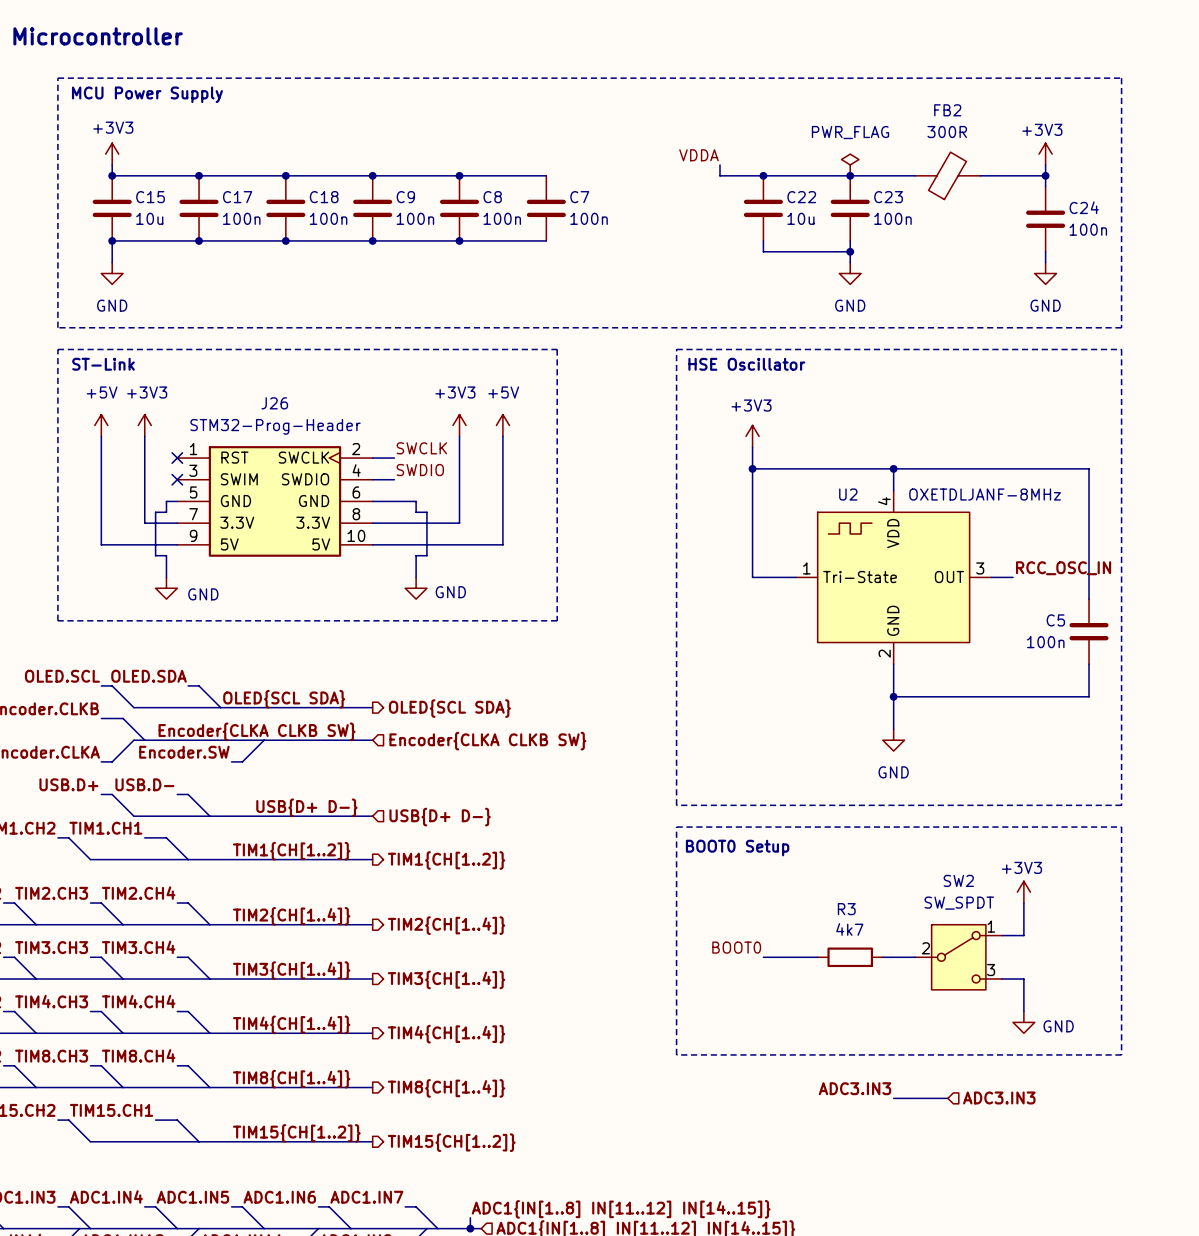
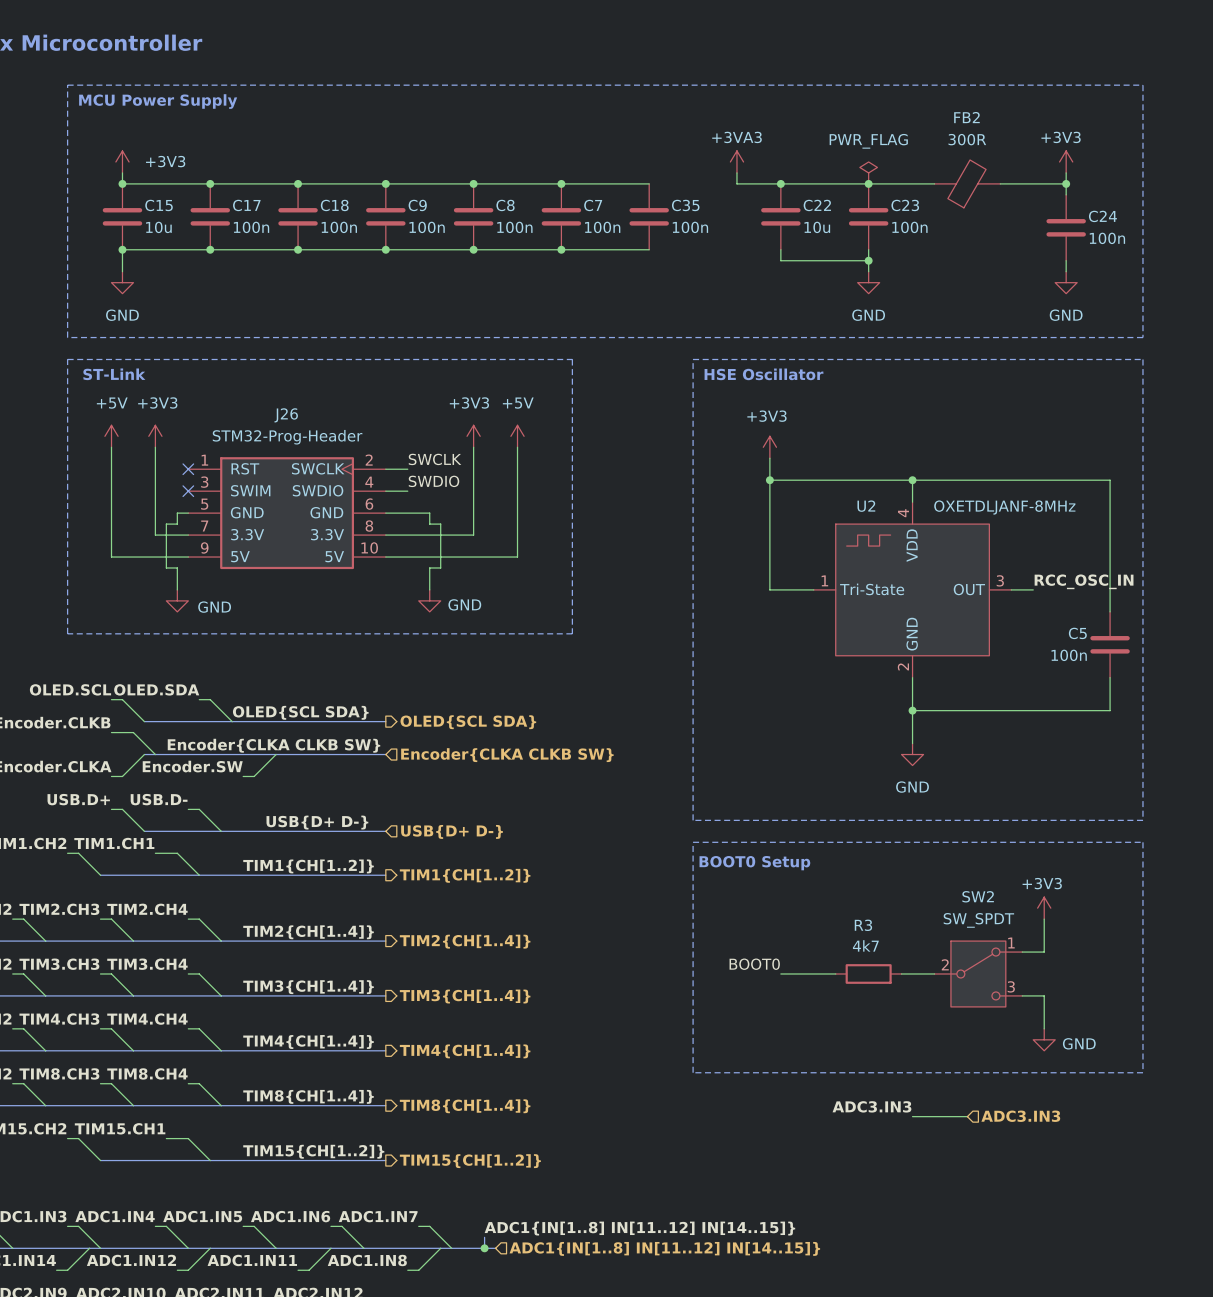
power symbol text position: +3V3 (113, 127) -> +3V3 (165, 161)
power symbol: none -> +3VA3 (736, 161)
label: VDDA (698, 155) -> none
wire: none -> (561, 183) (649, 183)
junction: none -> (561, 183)
C35: none -> 100n (649, 216)
wire: none -> (561, 249) (649, 249)
junction: none -> (561, 249)

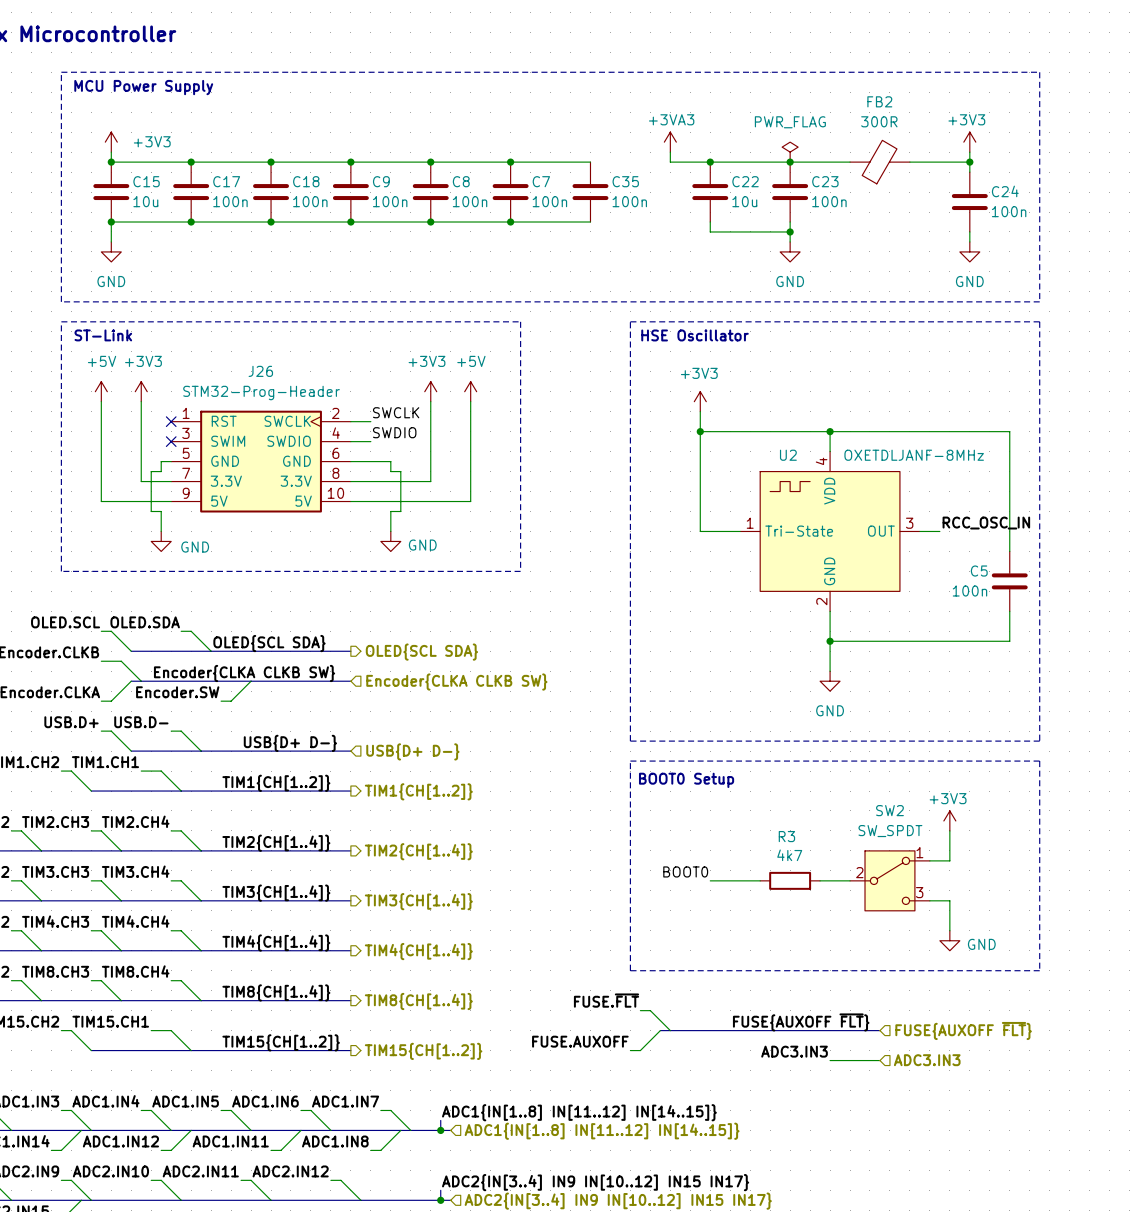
label: none -> FUSE.~{FLT} (606, 1000)
label position: ADC3.IN3 (871, 1106) -> ADC3.IN3 (794, 1051)
wire: none -> (640, 1010) (650, 1010) (670, 1030)
wire: (912, 1116) (967, 1116) -> (830, 1060) (879, 1060)
hierarchical label position: ADC3.IN3 (1020, 1116) -> ADC3.IN3 (927, 1060)
label: none -> FUSE{AUXOFF ~{FLT}} (801, 1022)
wire: none -> (660, 1030) (640, 1050) (630, 1050)
bus: none -> (660, 1030) (879, 1030)
hierarchical label: none -> FUSE{AUXOFF ~{FLT}} (963, 1030)
label: none -> FUSE.AUXOFF (580, 1041)

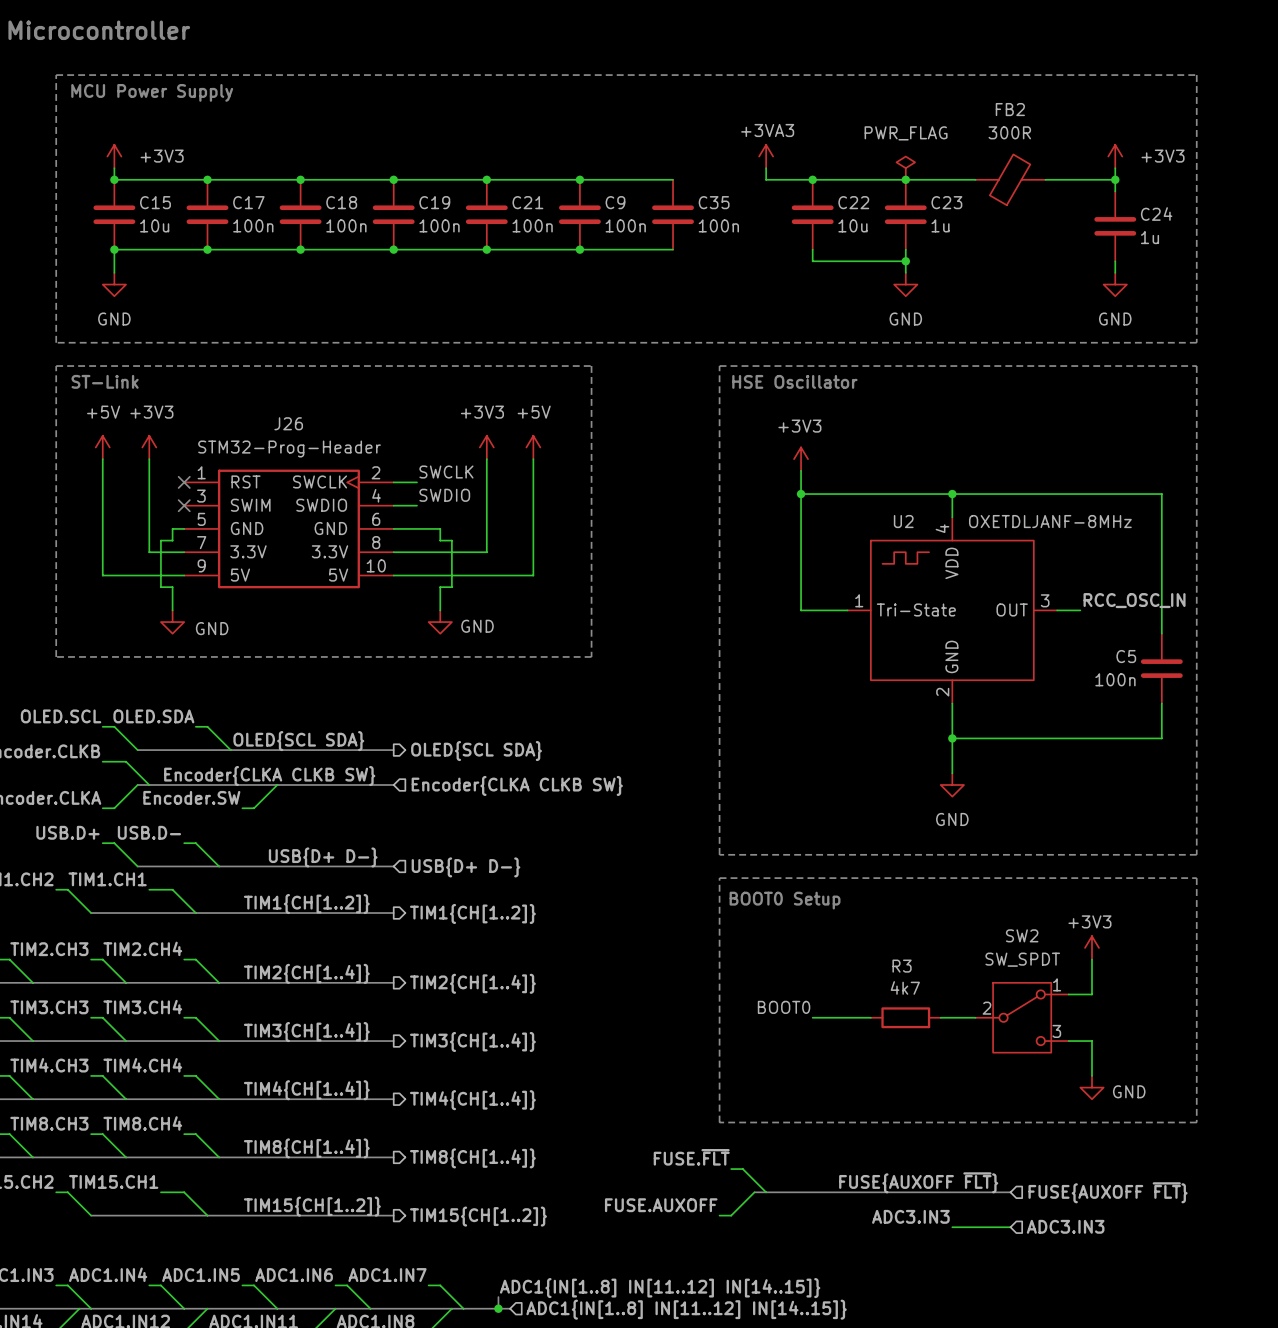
power symbol text position: +3V3 (966, 119) -> +3V3 (1163, 156)
C9 name: C9 (381, 181) -> C19 (434, 202)
C8 name: C8 (461, 181) -> C21 (527, 202)
C7 name: C7 (541, 181) -> C9 (615, 202)
C23 value: 100n (829, 201) -> 1u (940, 225)
C24 value: 100n (1009, 211) -> 1u (1150, 237)

